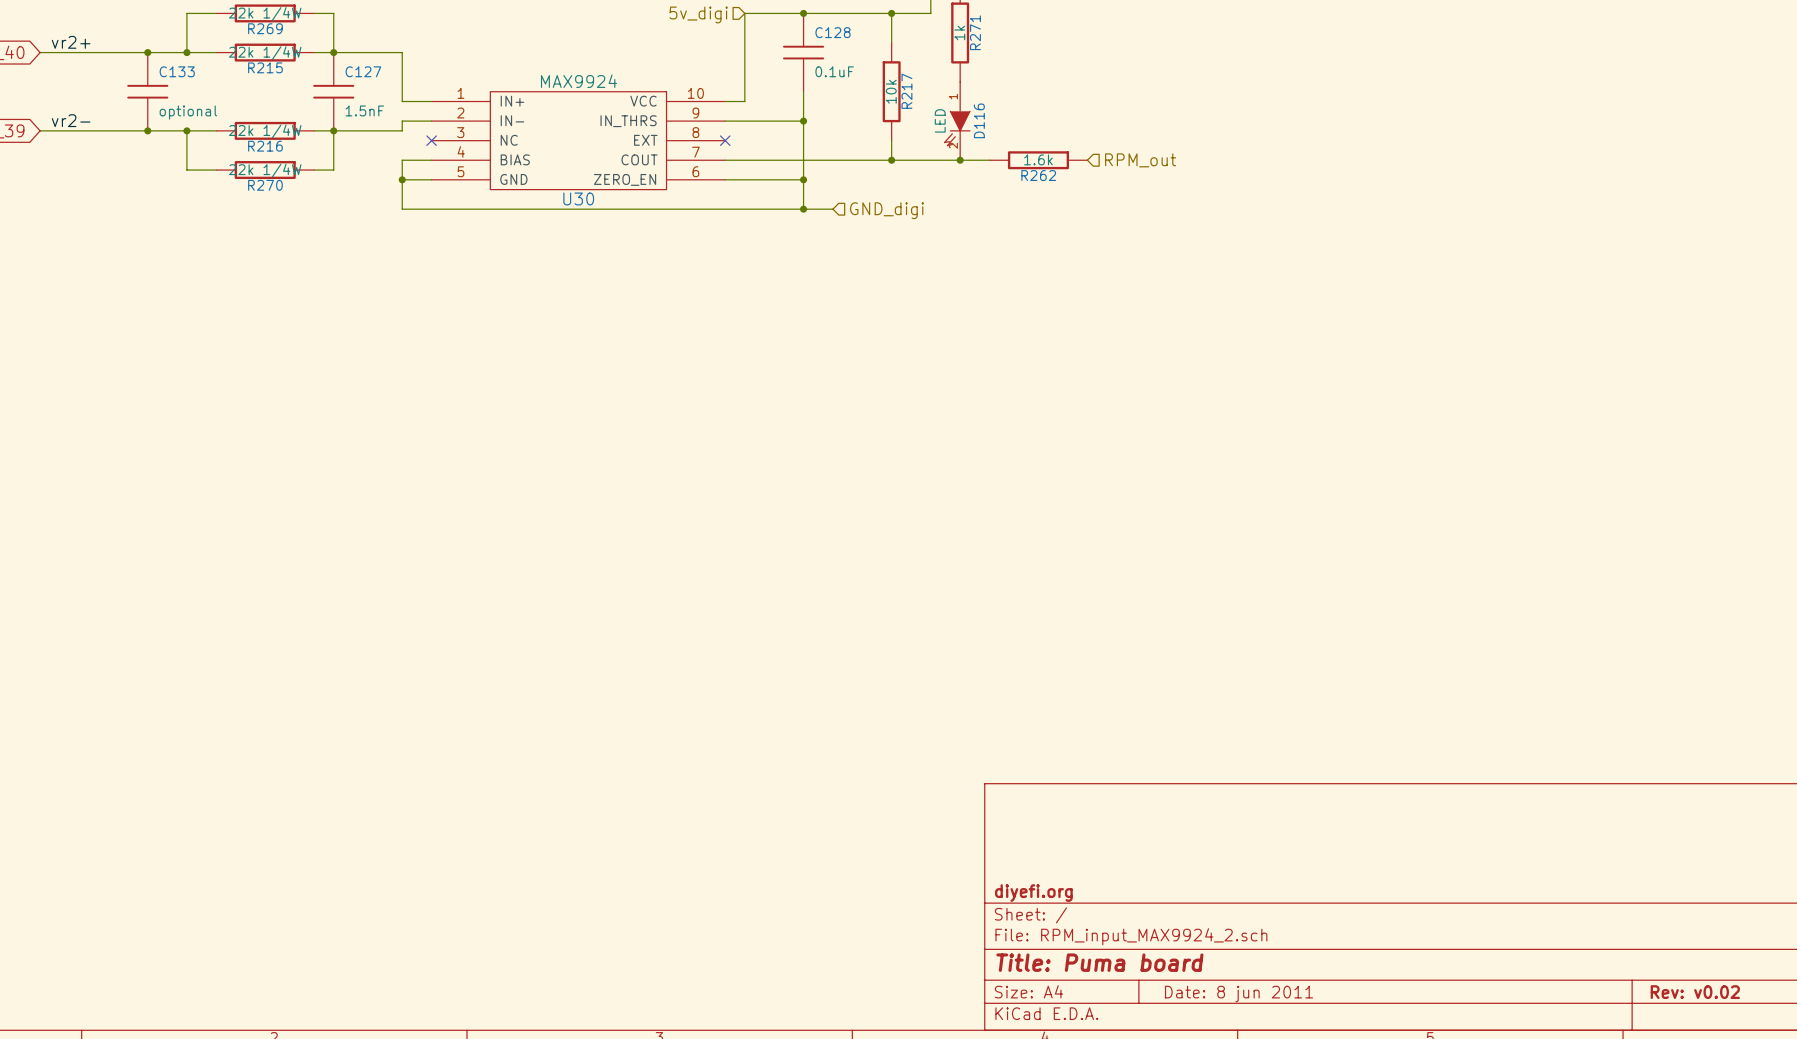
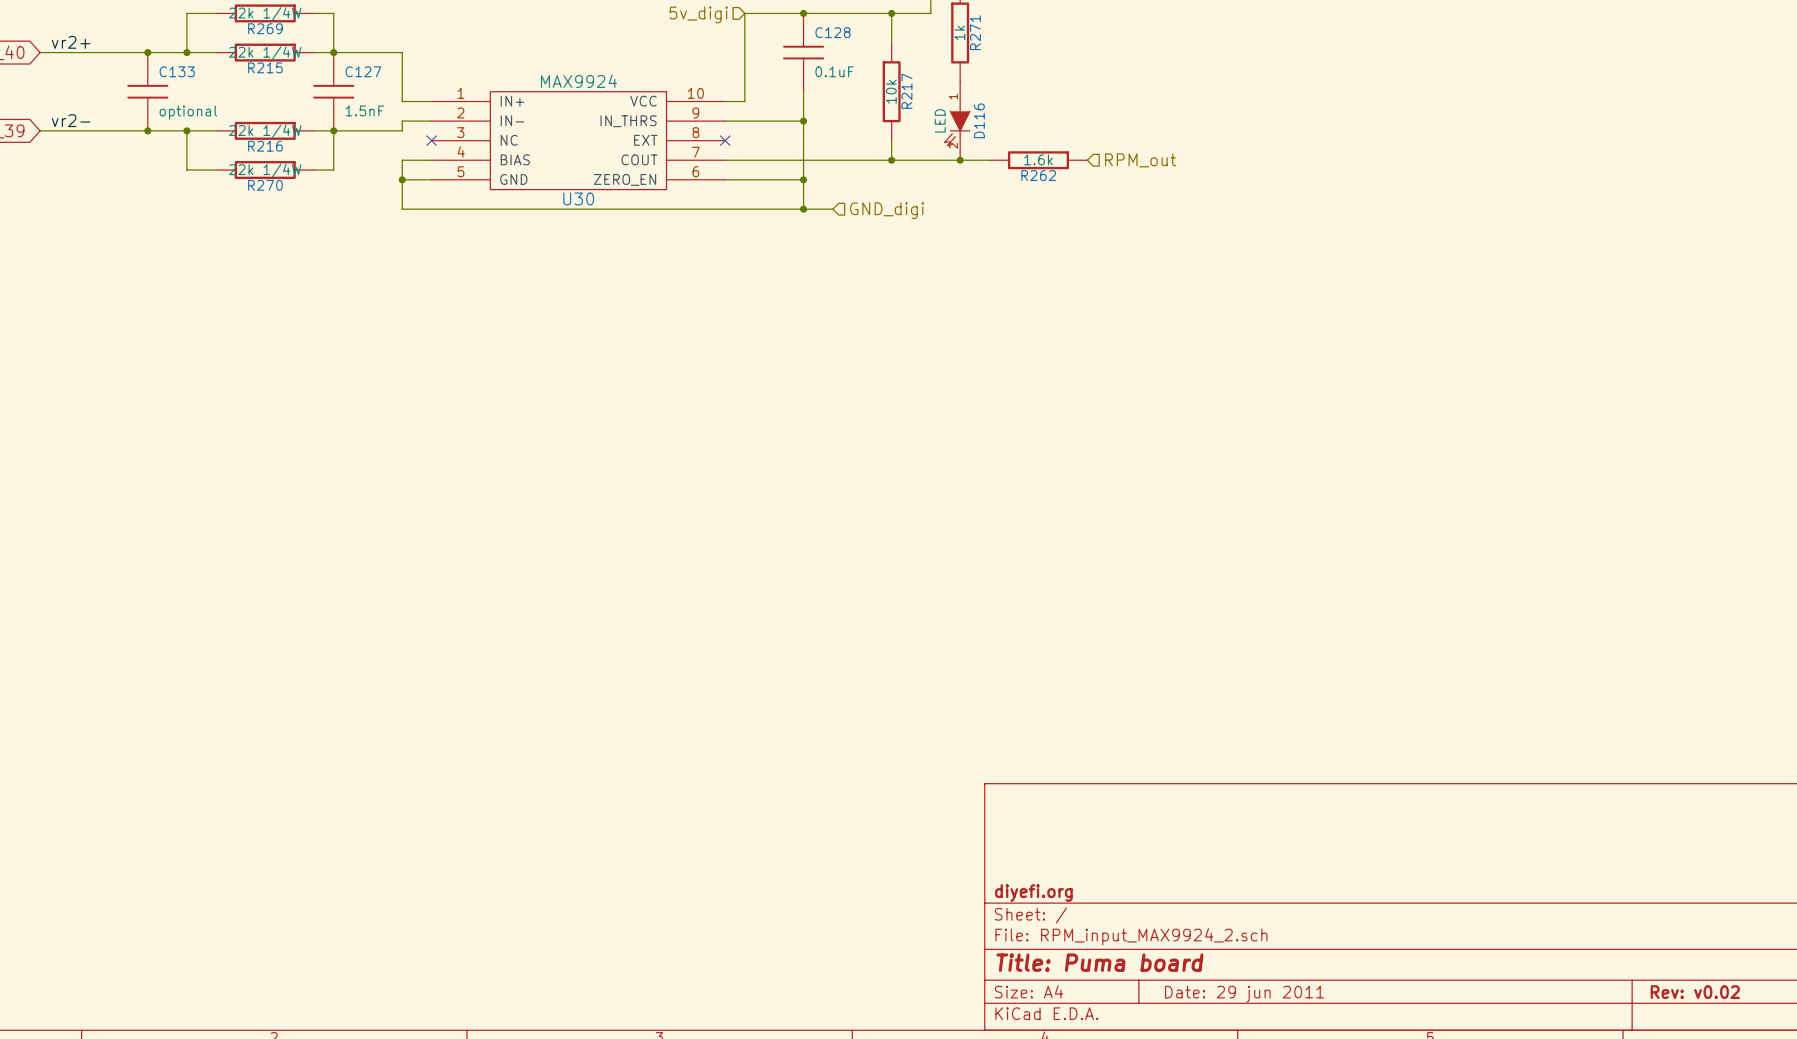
title block: Date: 8 jun 2011 (1239, 994) -> Date: 29 jun 2011 (1244, 994)

